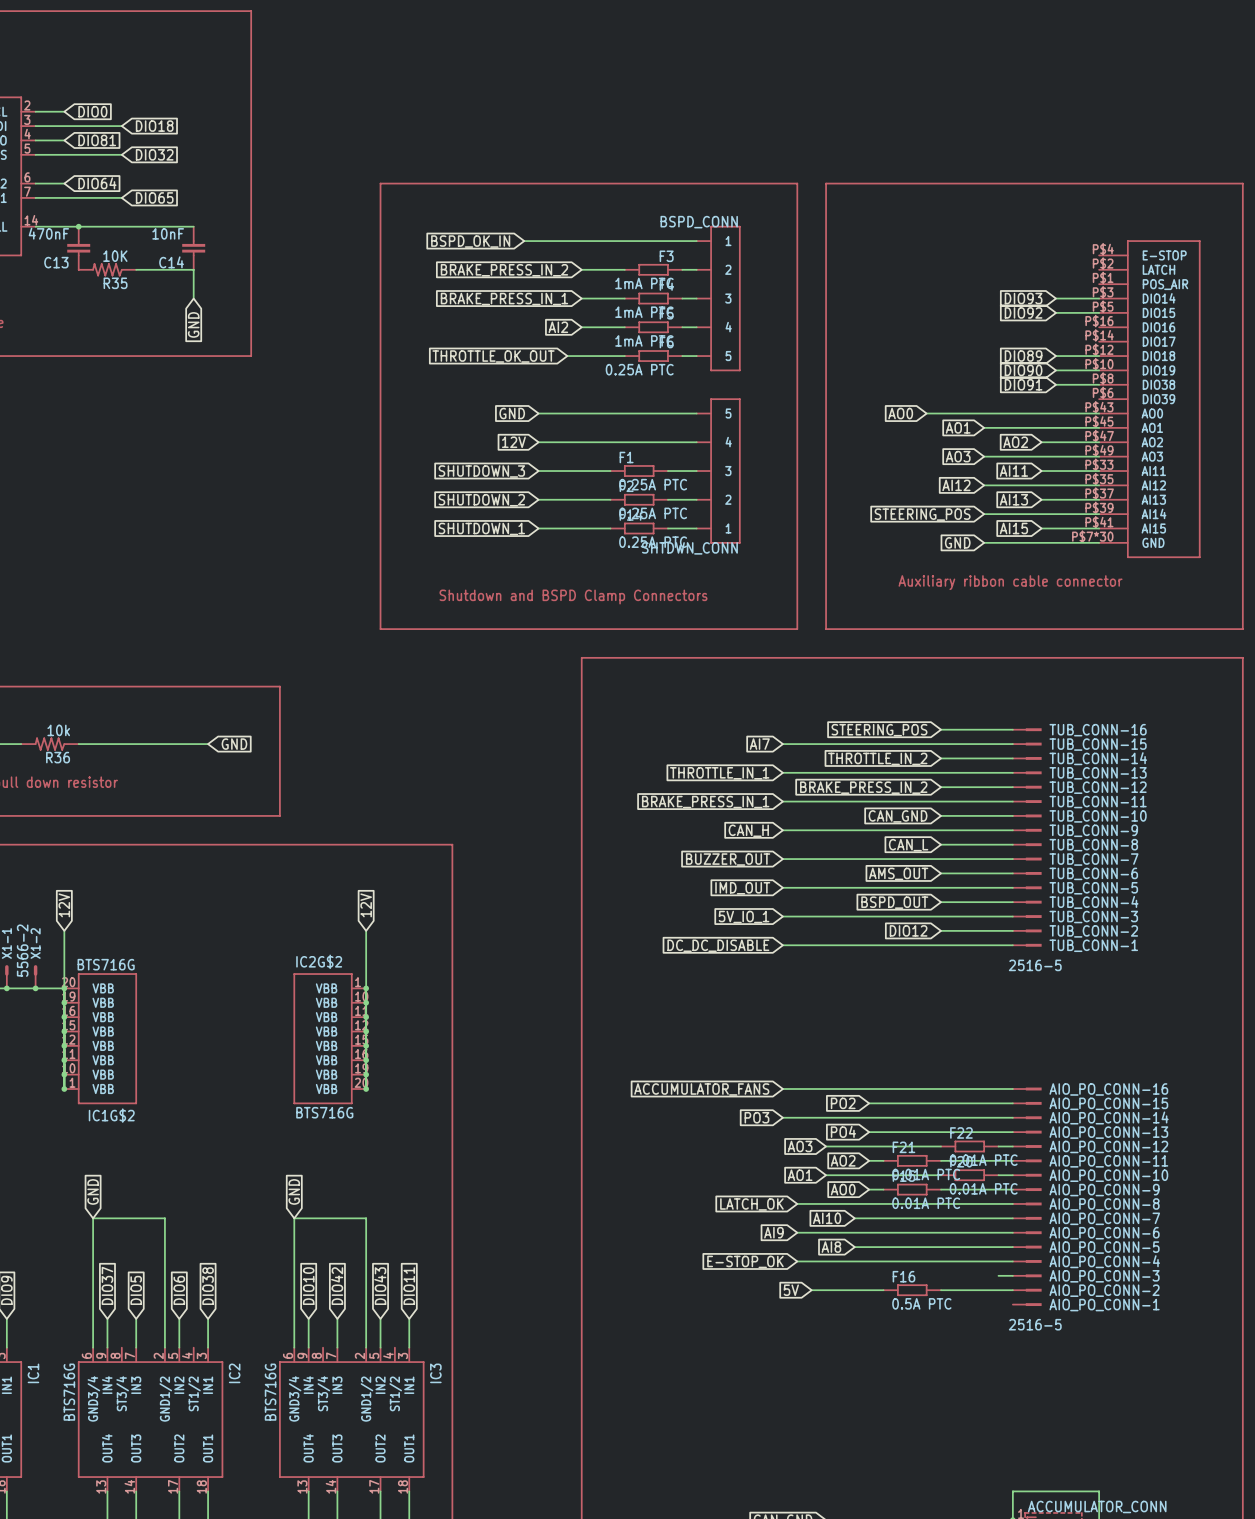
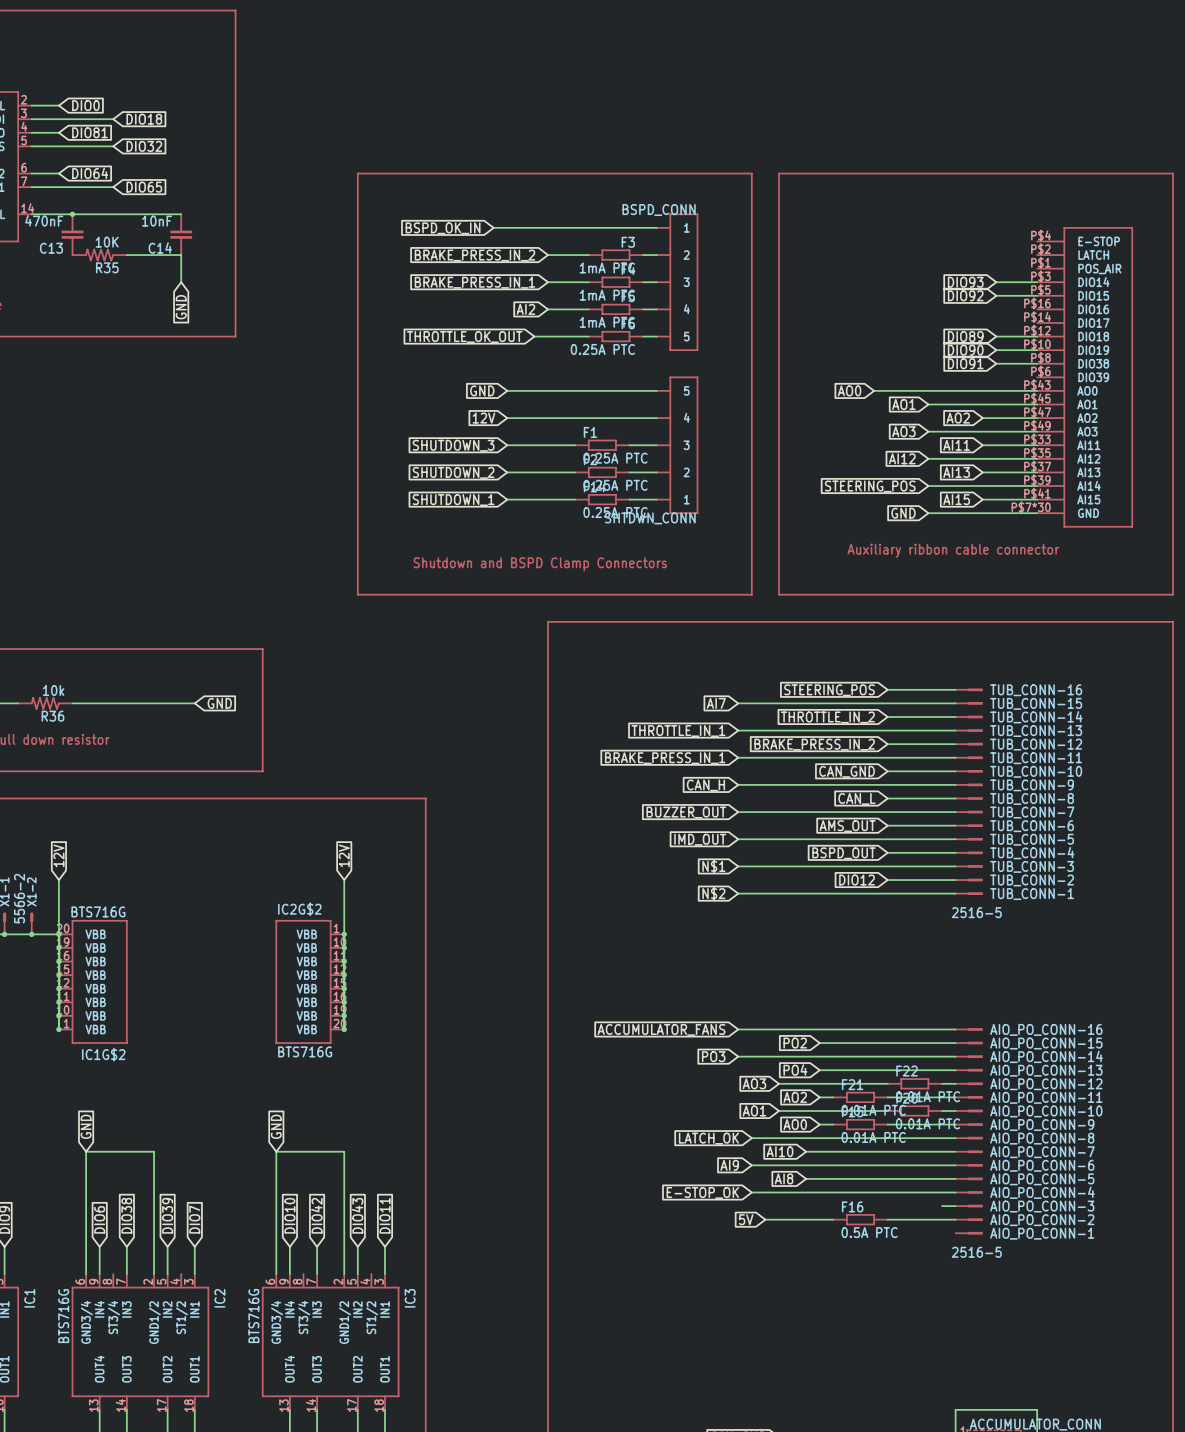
global label: 5V_IO_1 (744, 917) -> N$1 (713, 866)
global label: DC_DC_DISABLE (718, 945) -> N$2 (713, 893)
global label: DIO37 (107, 1285) -> DIO6 (99, 1219)
global label: DIO38 (208, 1286) -> DIO7 (194, 1219)
global label: DIO5 (136, 1290) -> DIO38 (126, 1215)
global label: DIO6 (179, 1290) -> DIO39 (167, 1215)

